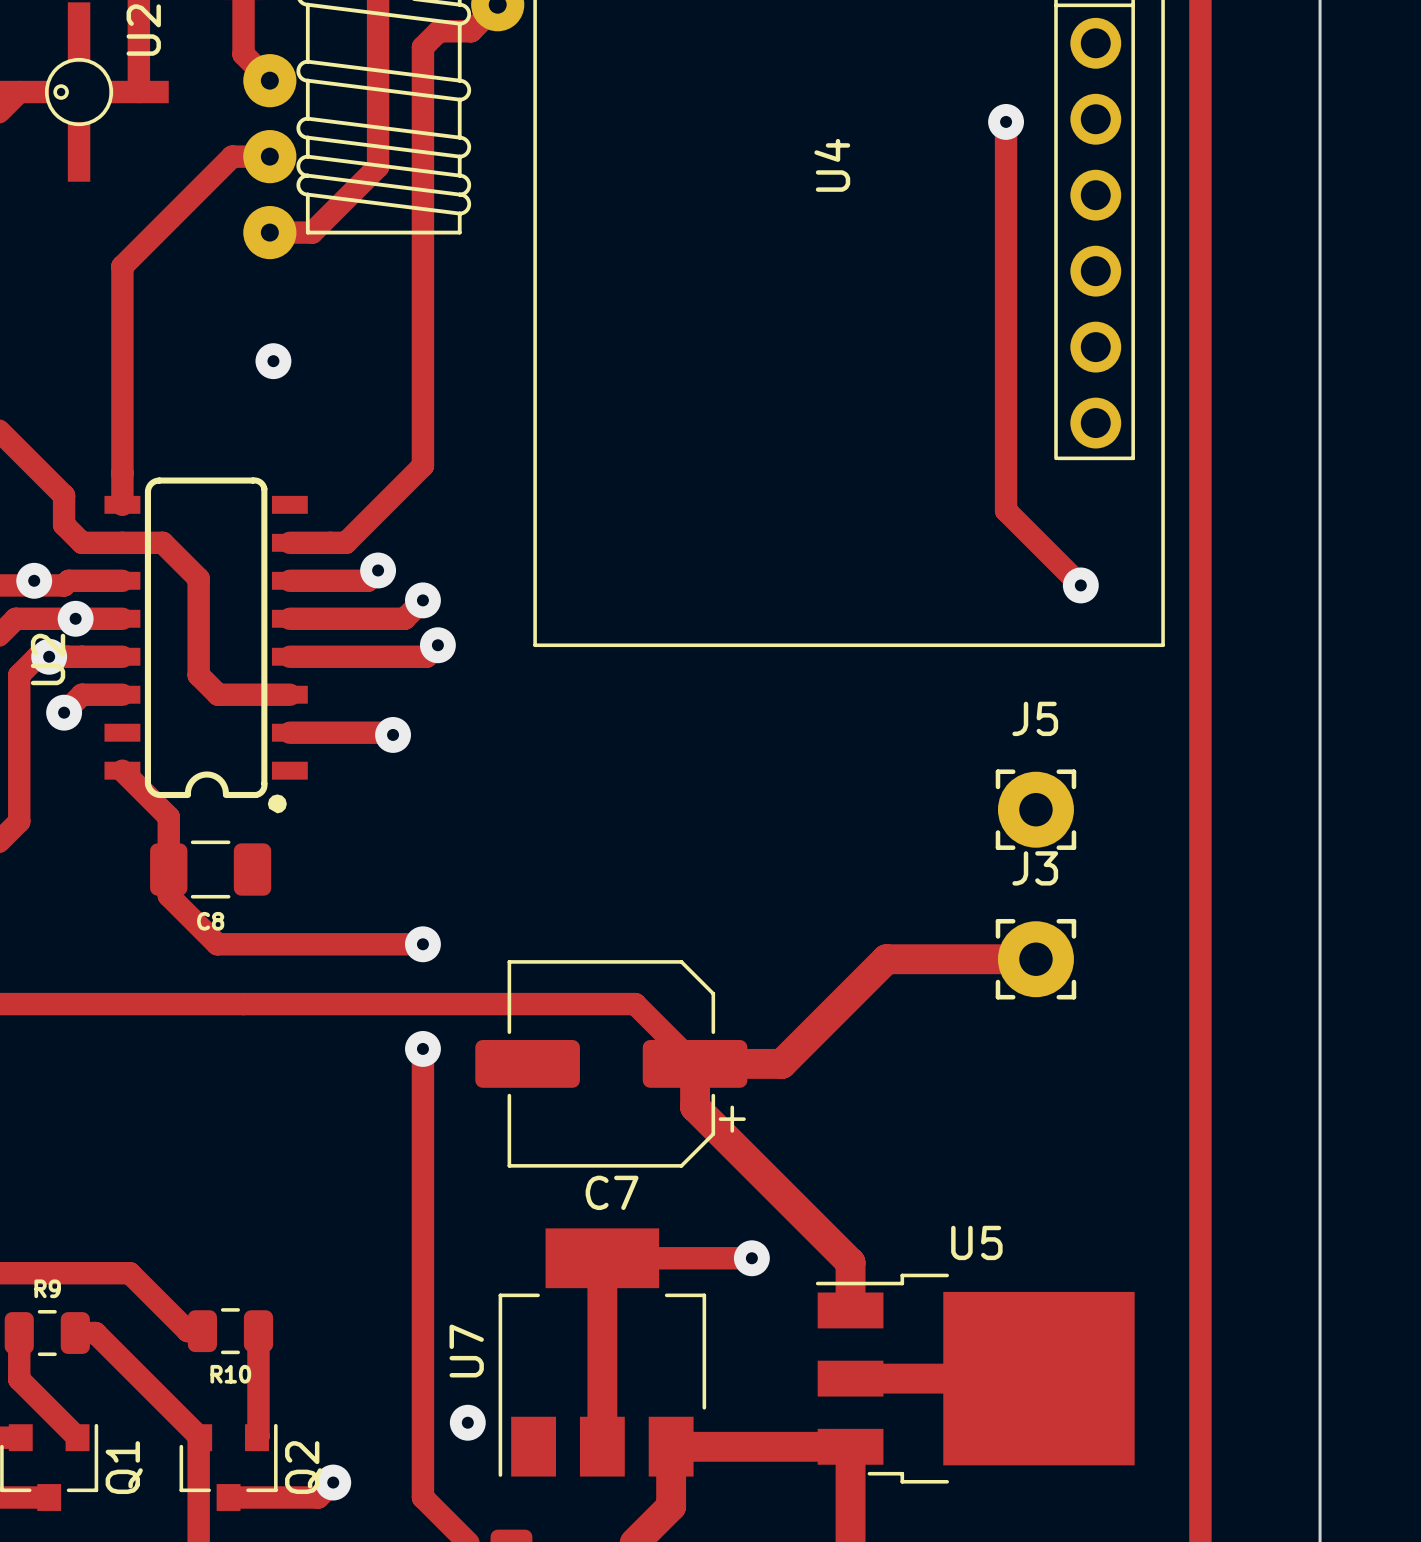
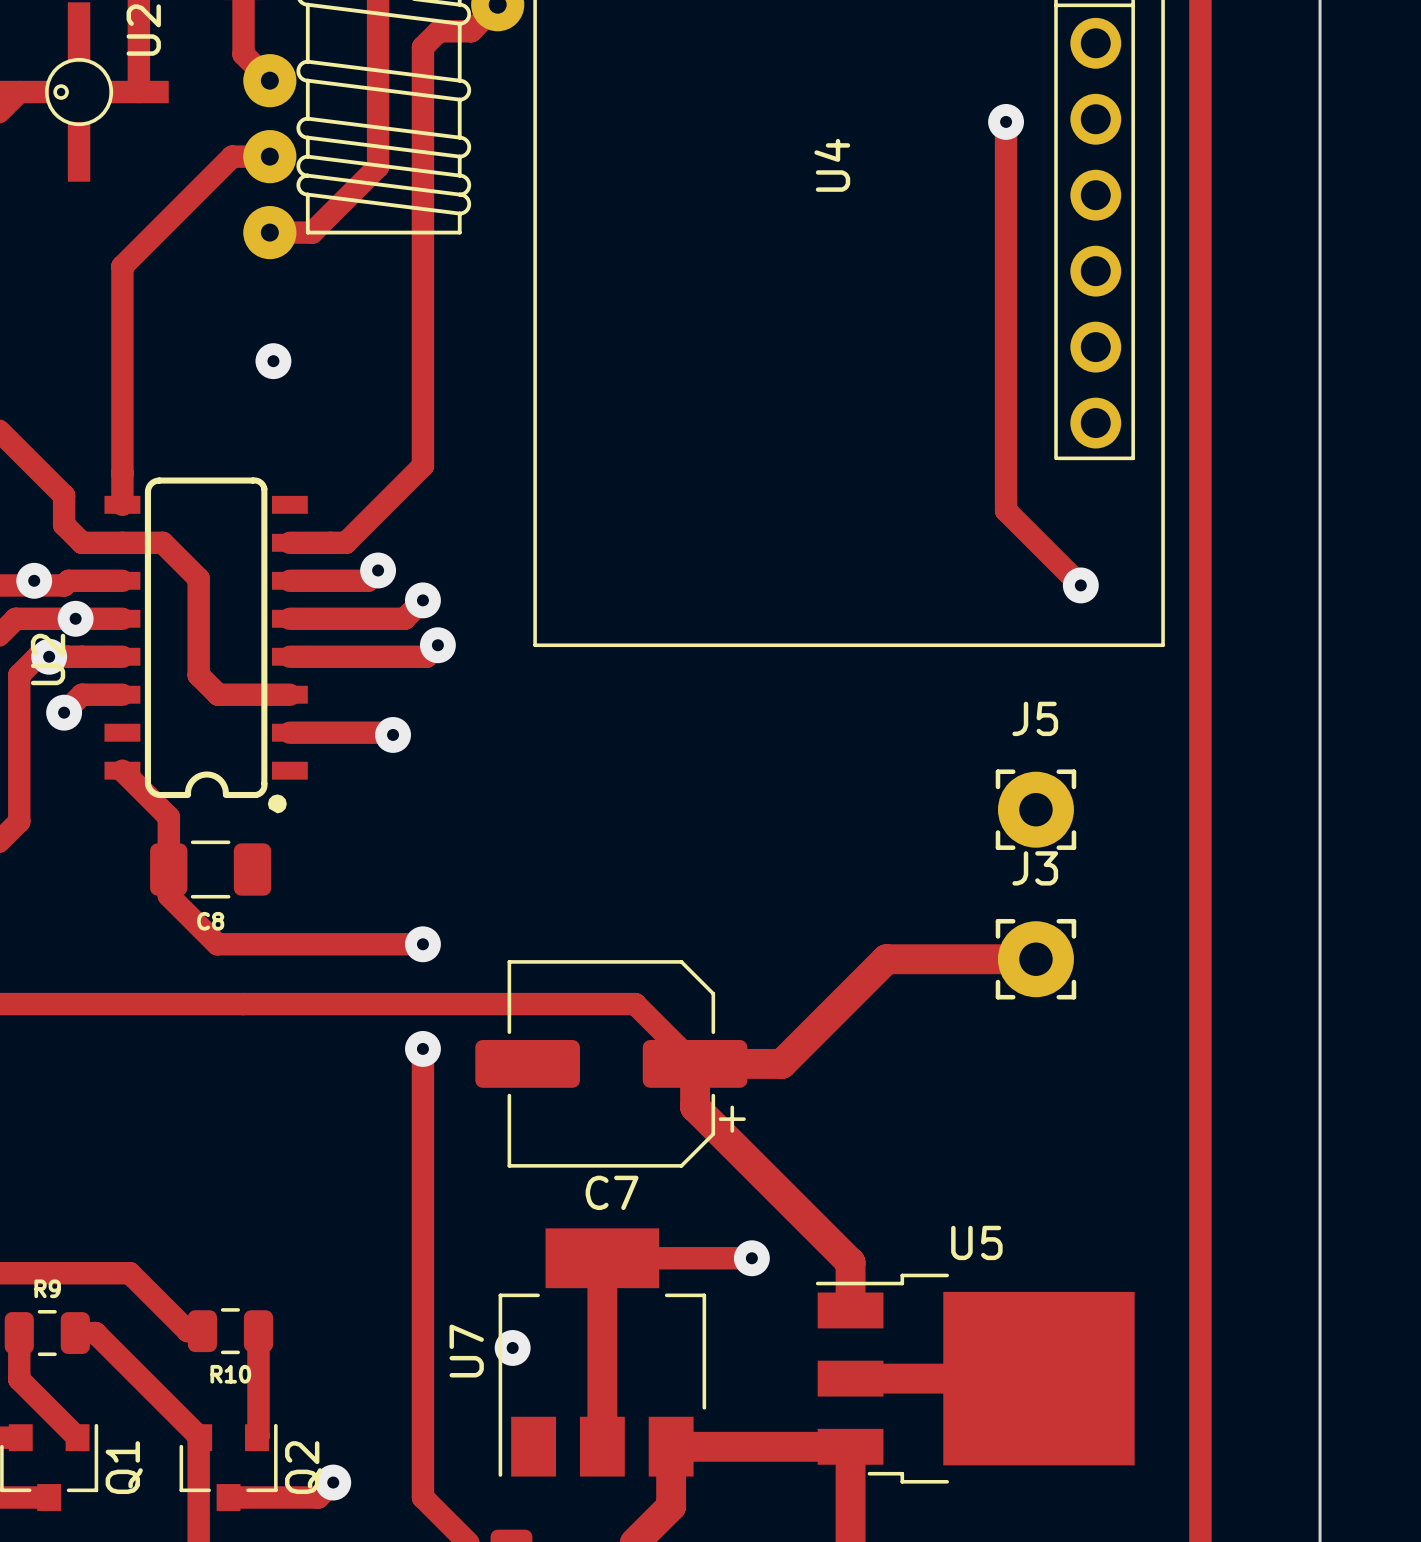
via position: (467, 1422) -> (512, 1347)

